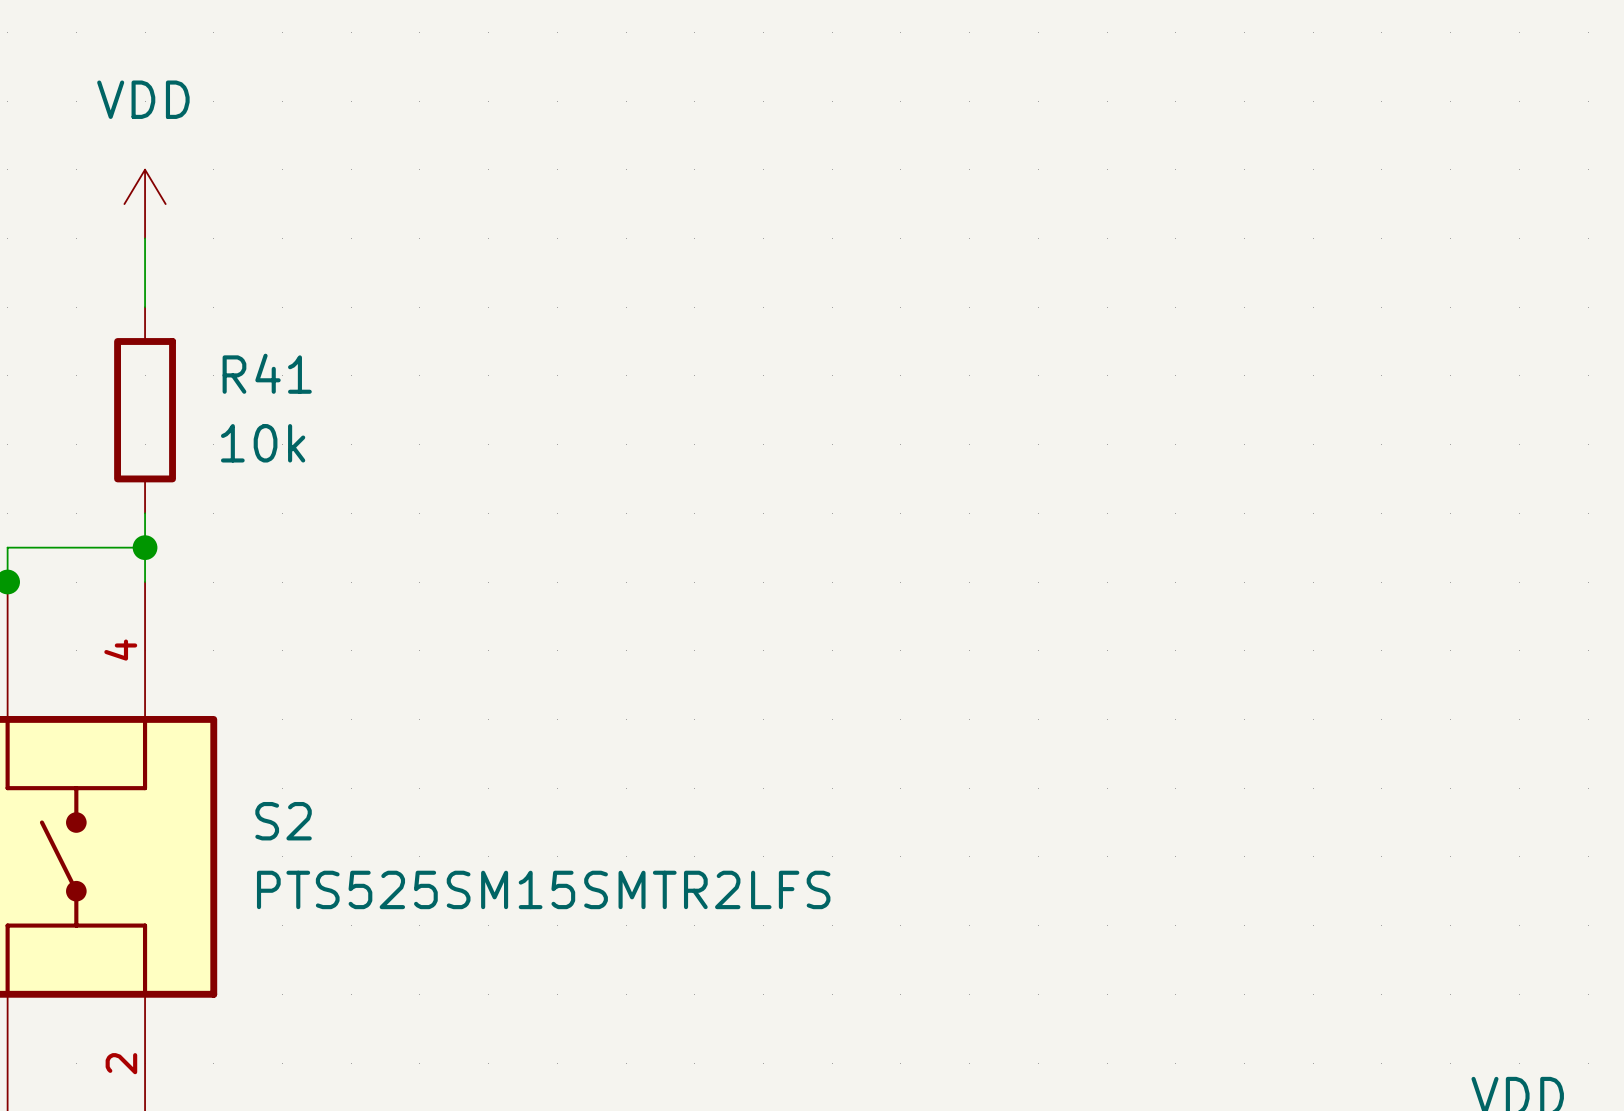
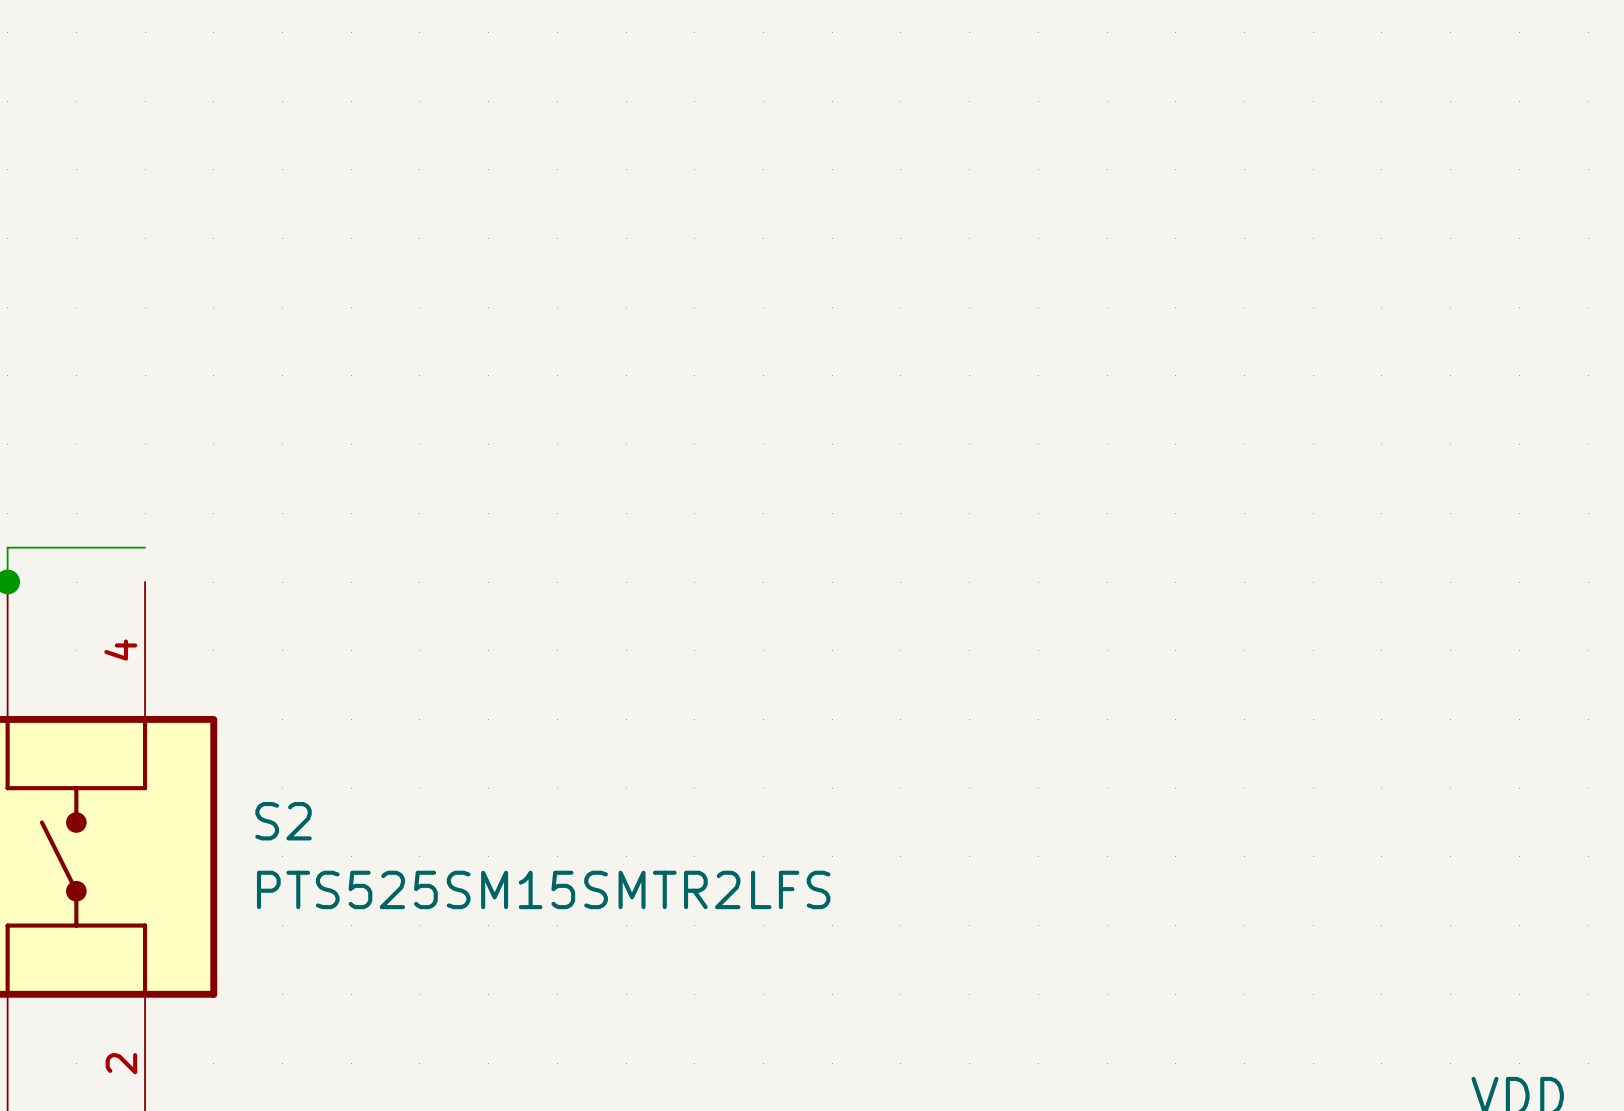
power symbol: VDD (145, 204) -> none
wire: (145, 238) (145, 307) -> none
R41: 10k (145, 410) -> none
wire: (145, 513) (145, 582) -> none
junction: (145, 547) -> none

